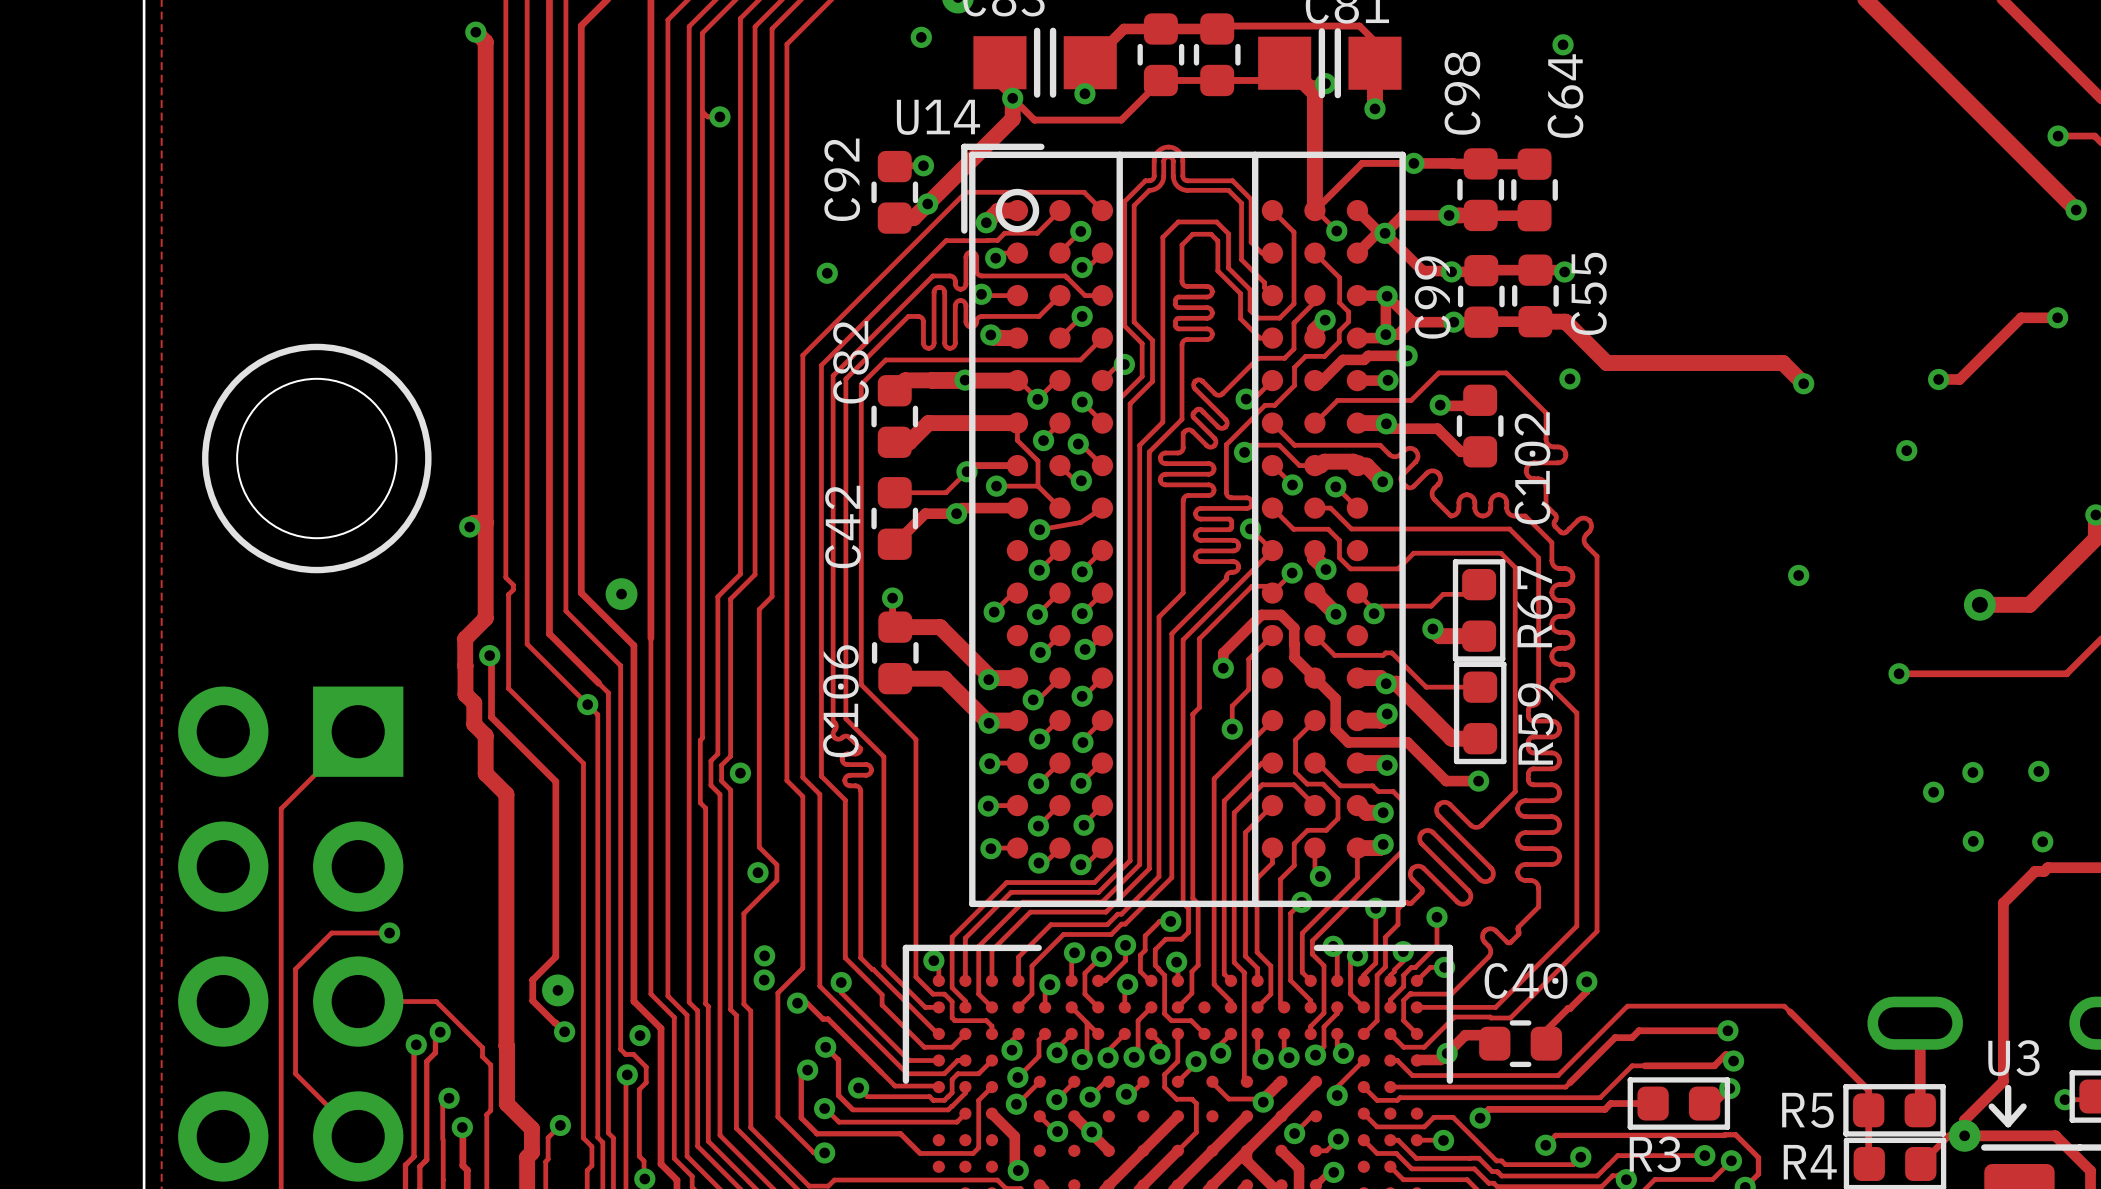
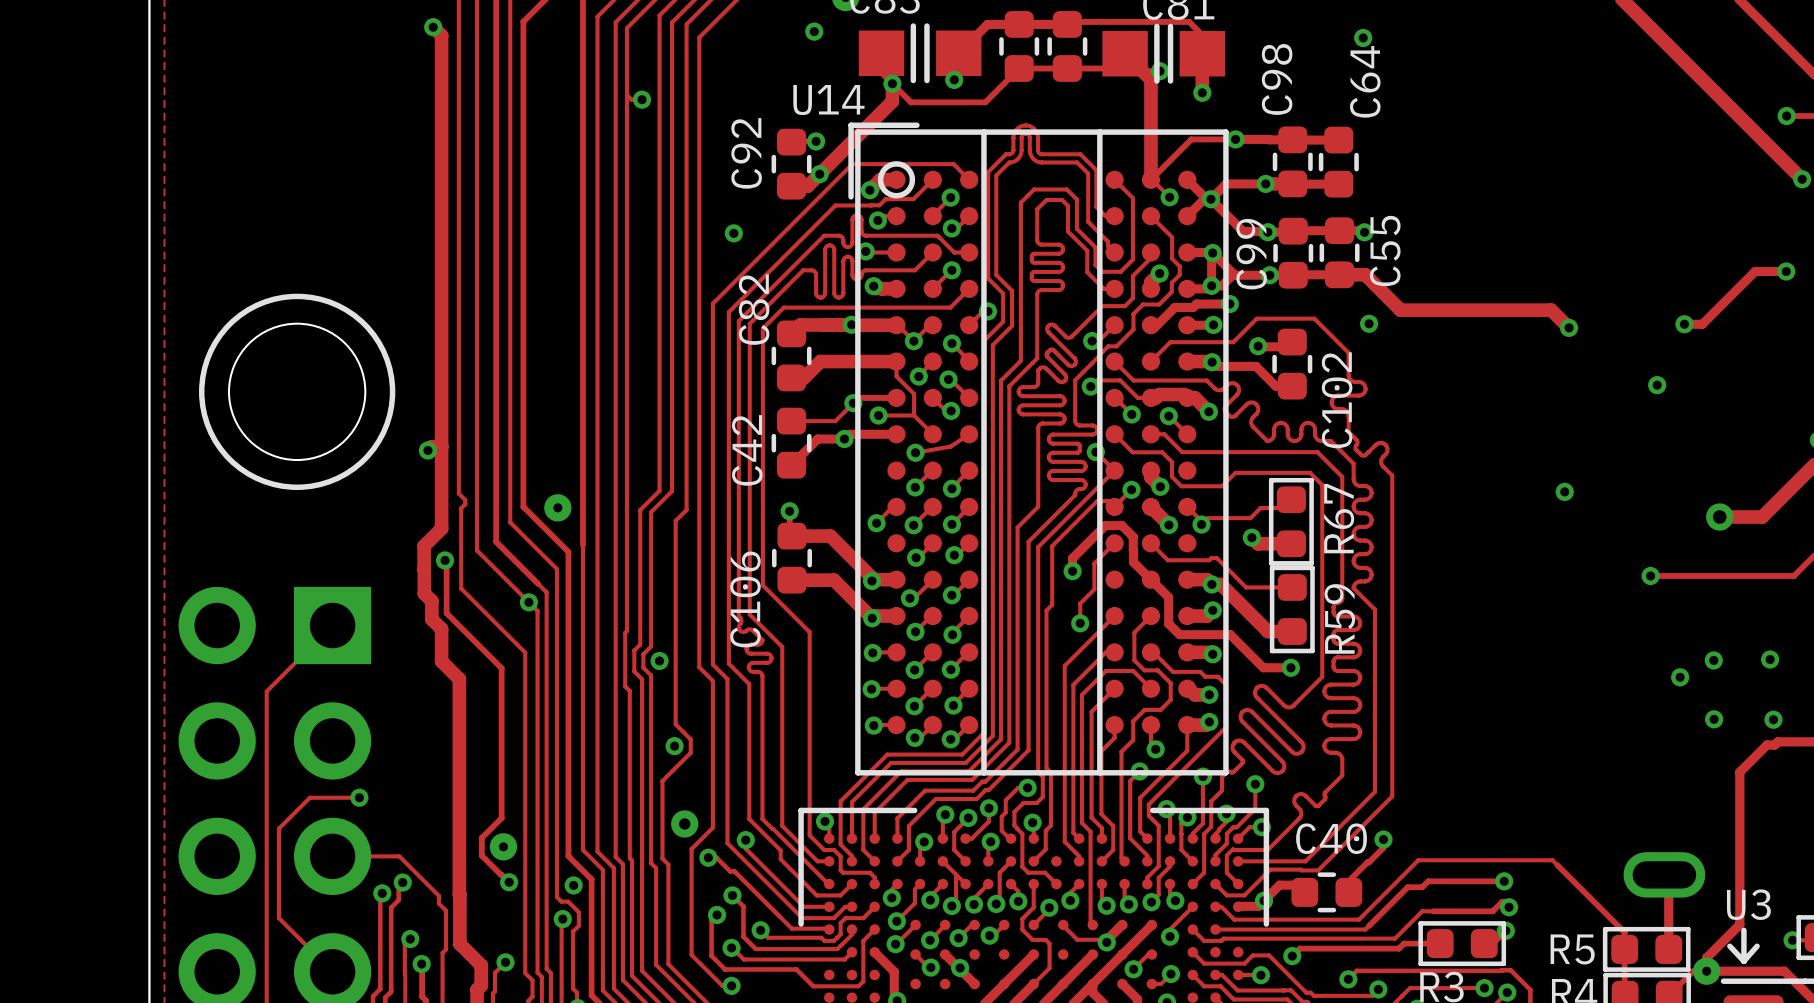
via: (764, 955) -> none
via: none -> (684, 823)
via: (764, 980) -> none

